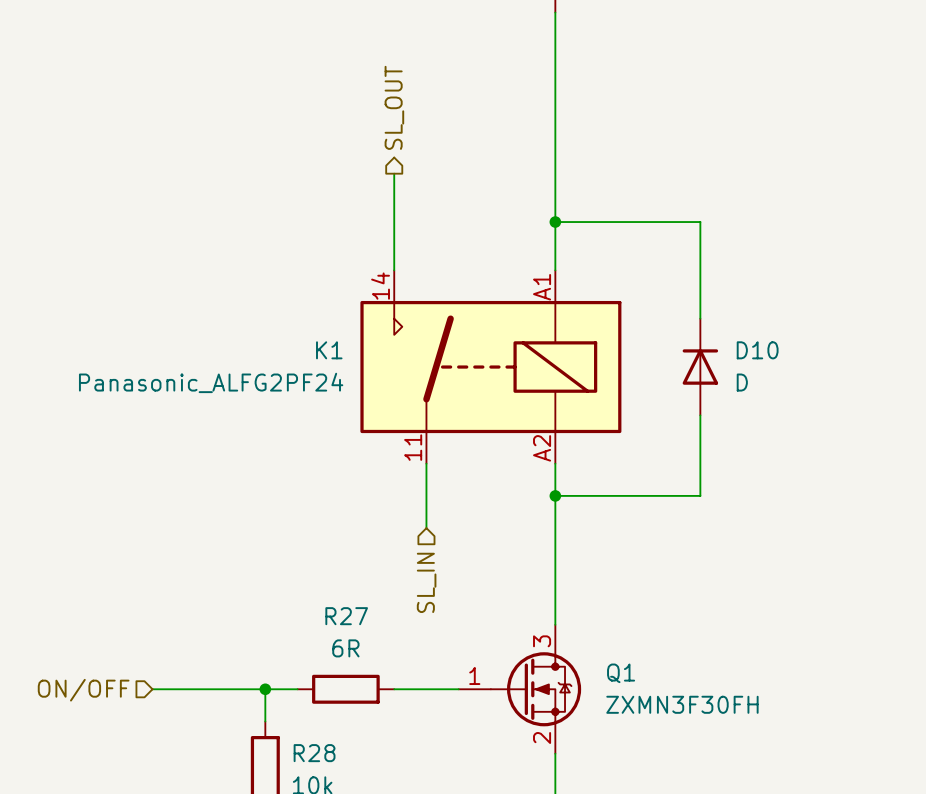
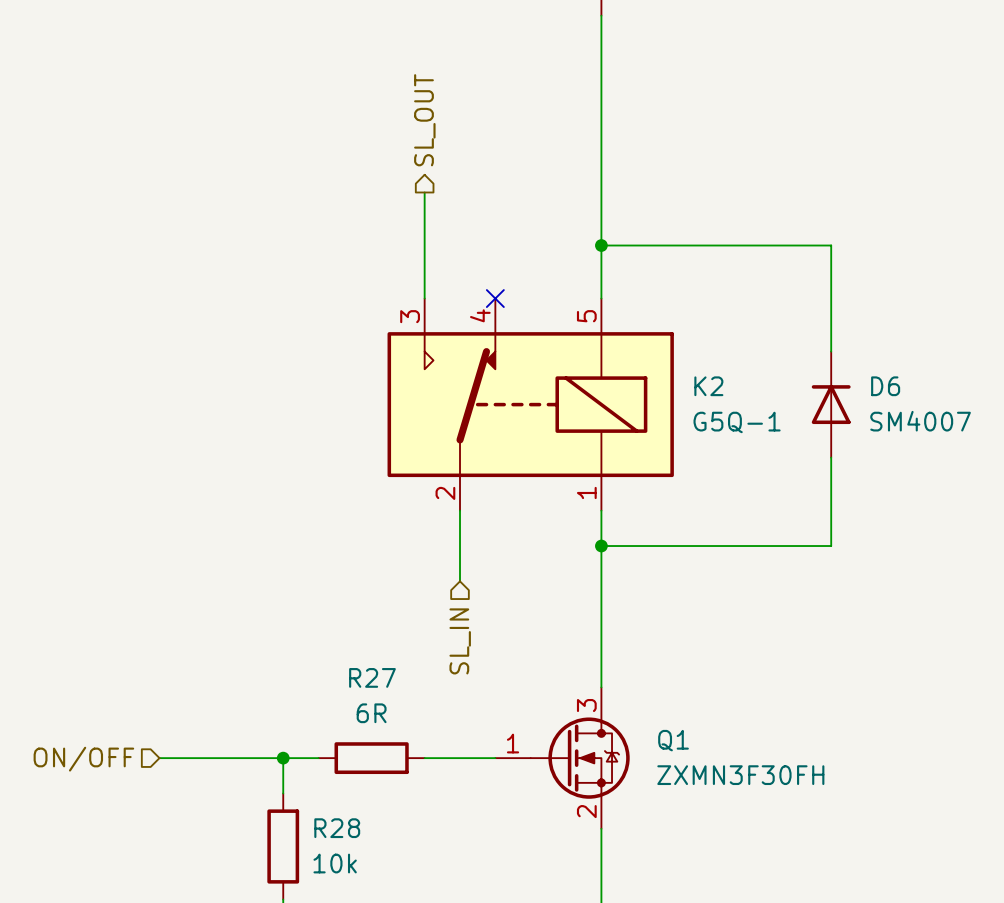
wire: (700, 222) (700, 318) -> (760, 245) (831, 245) (831, 351)
no-connect mark: none -> (495, 298)
K1: Panasonic_ALFG2PF24 (490, 367) -> none
K2: none -> G5Q-1 (530, 404)
D10: D (700, 367) -> none
D6: none -> SM4007 (831, 404)
wire: (700, 415) (700, 495) -> (831, 457) (831, 546) (760, 546)

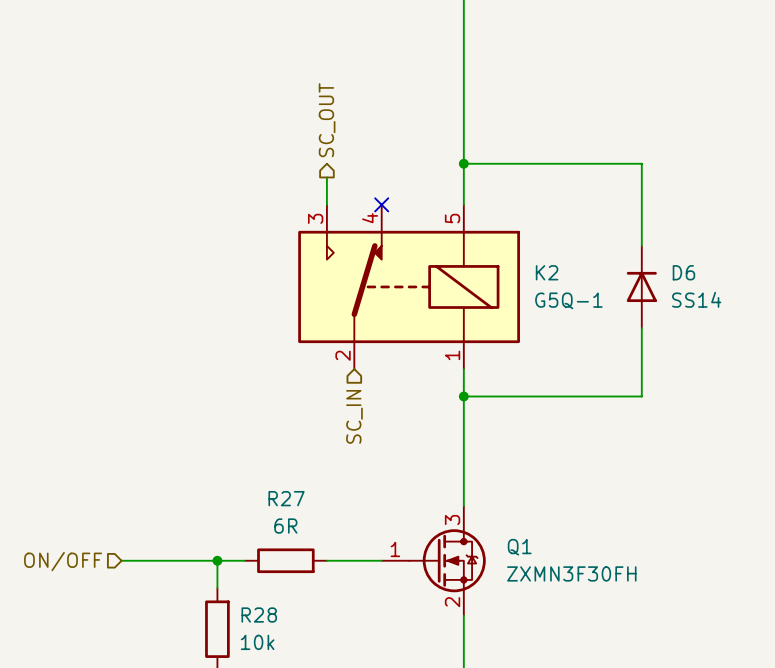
hierarchical label: SL_OUT (424, 120) -> SC_OUT (327, 120)
wire: (424, 192) (424, 263) -> none
D6 value: SM4007 (920, 421) -> SS14 (696, 299)
wire: (460, 510) (460, 581) -> none
hierarchical label: SL_IN (460, 641) -> SC_IN (354, 416)

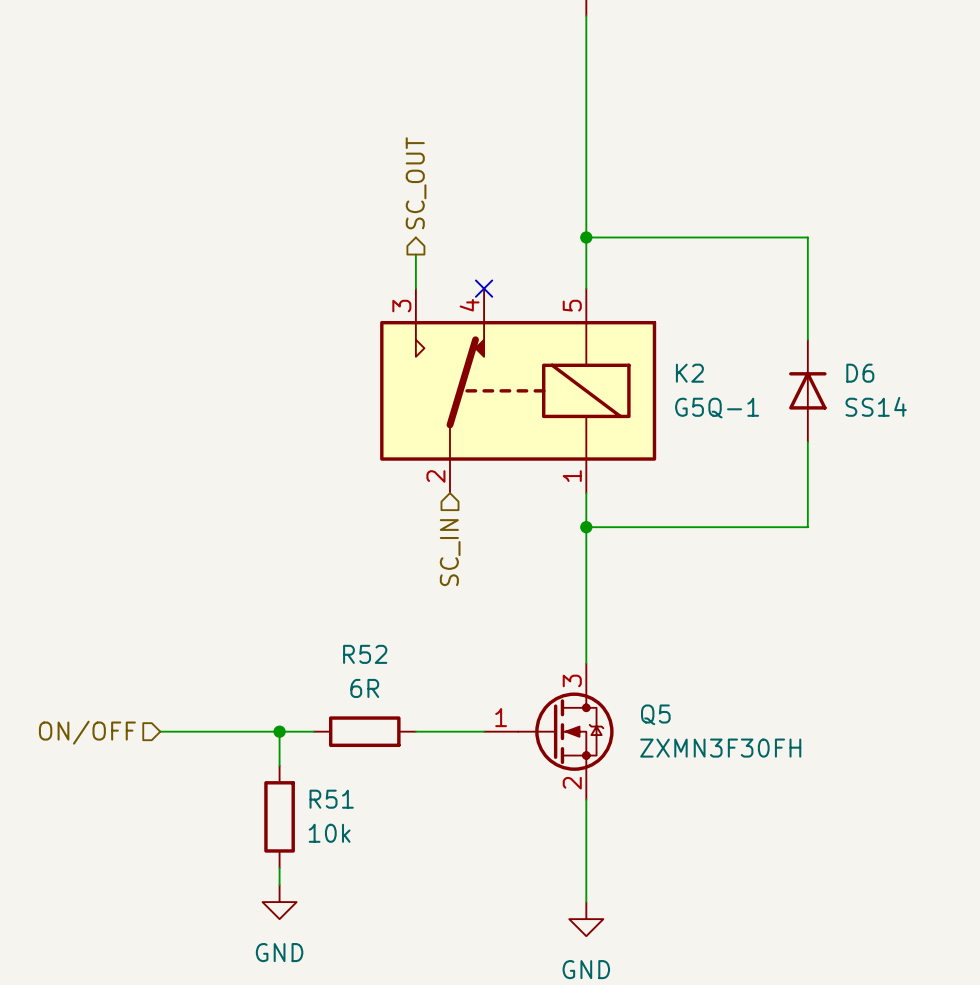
R27 name: R27 (286, 498) -> R52 (365, 654)
Q1 name: Q1 (519, 547) -> Q5 (655, 714)
R28 name: R28 (259, 615) -> R51 (331, 799)

